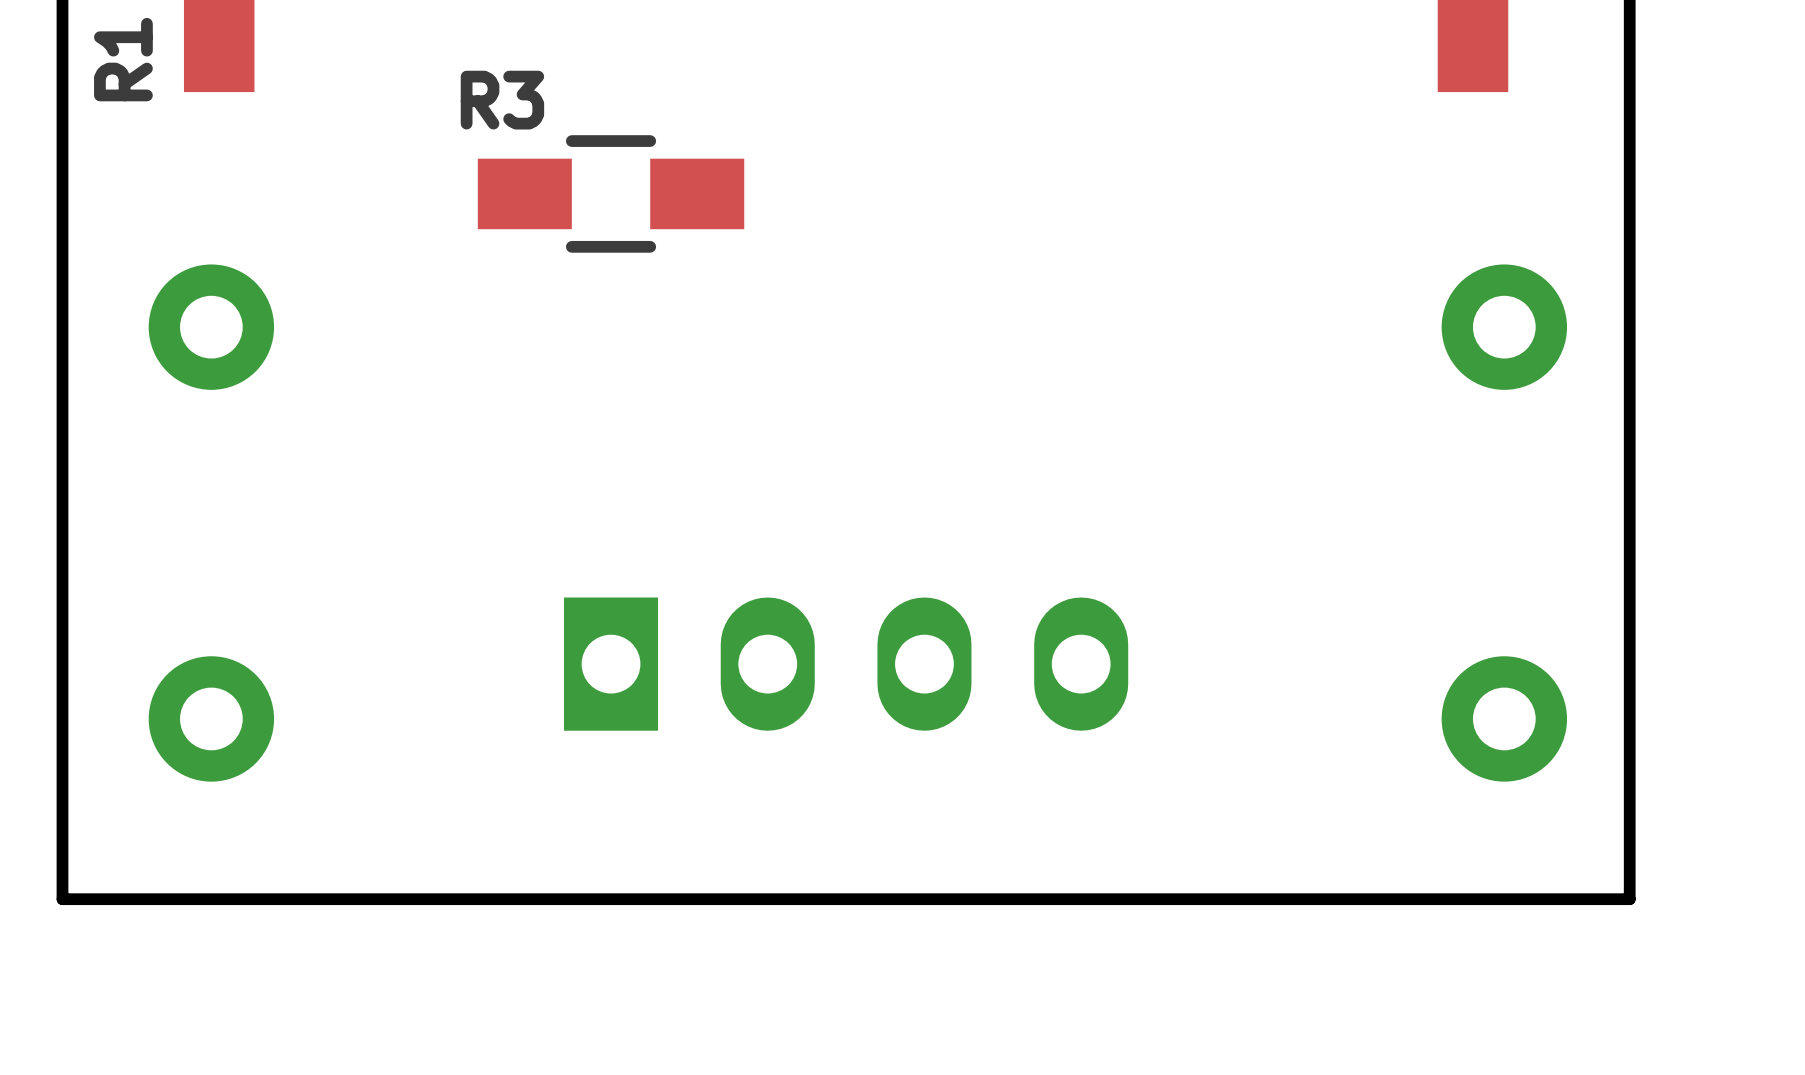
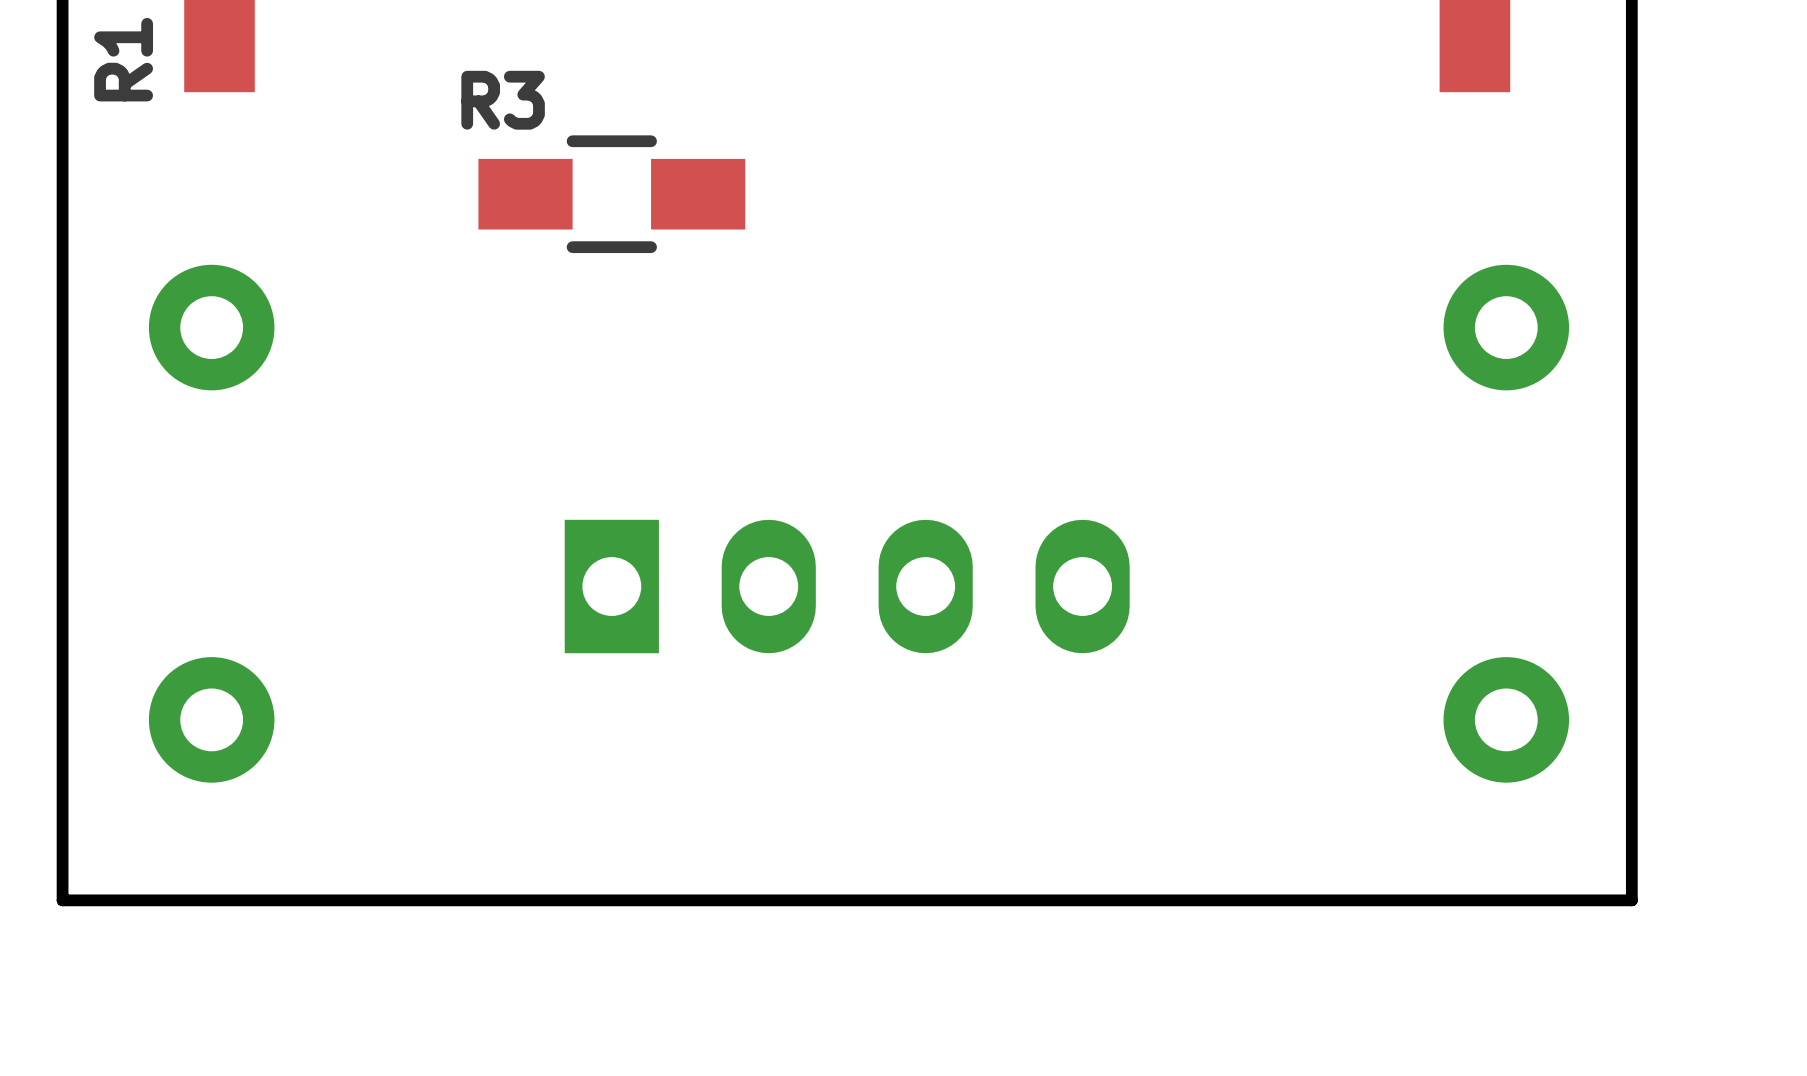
part position: (846, 664) -> (847, 586)

